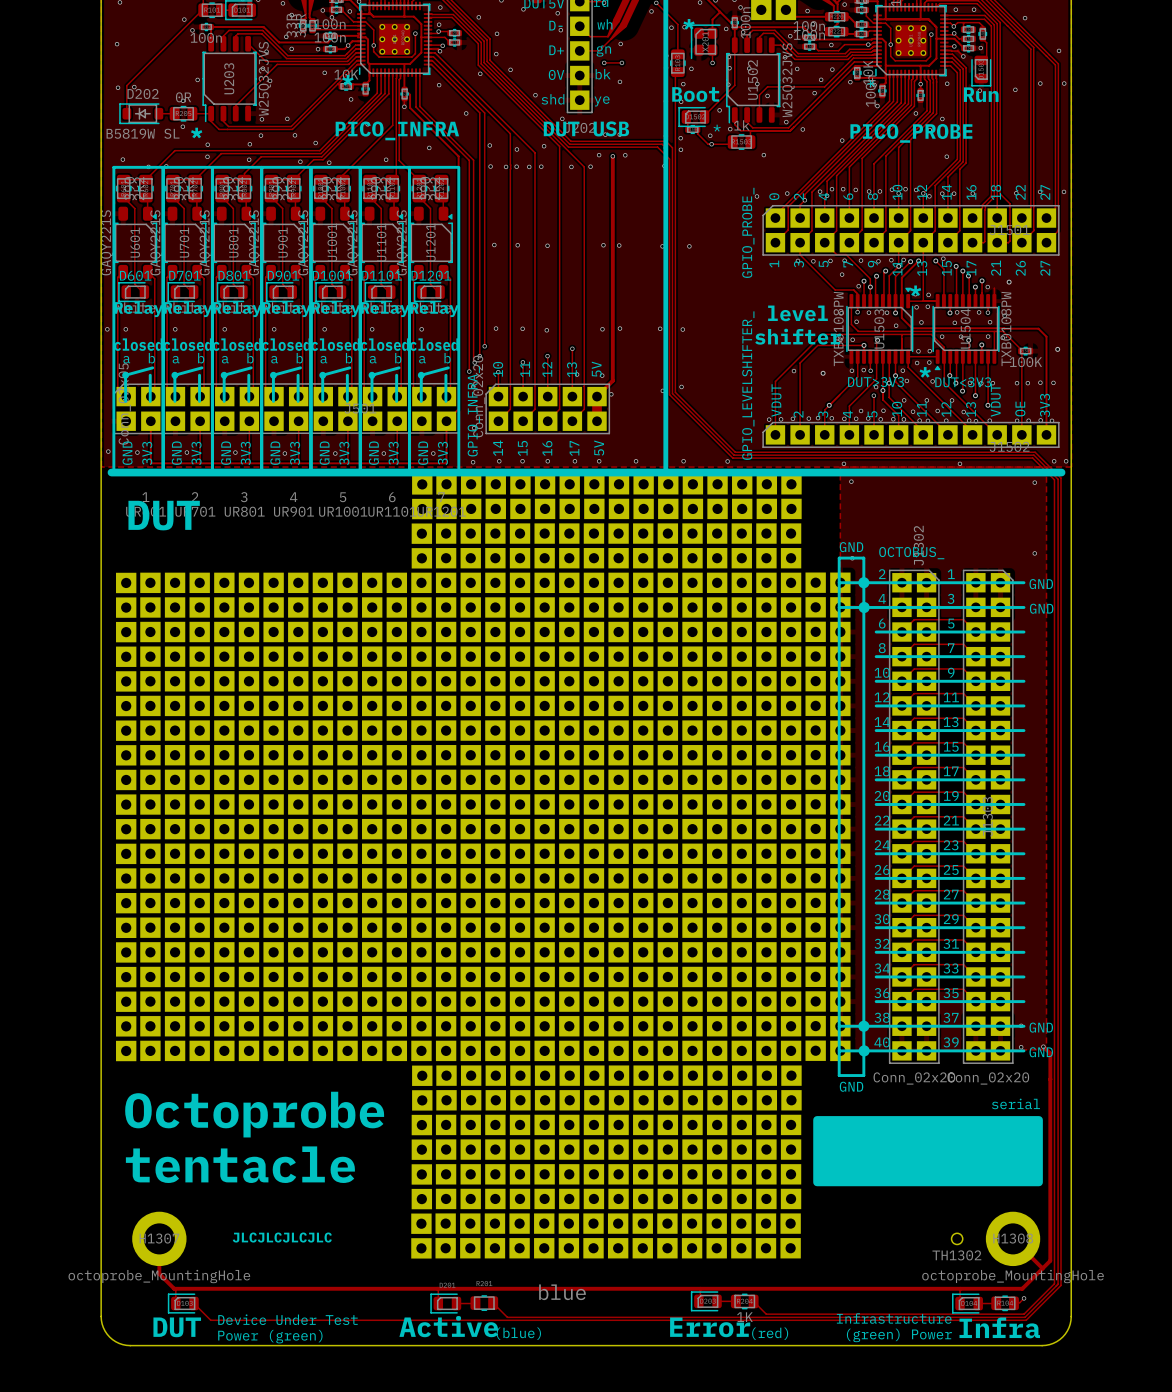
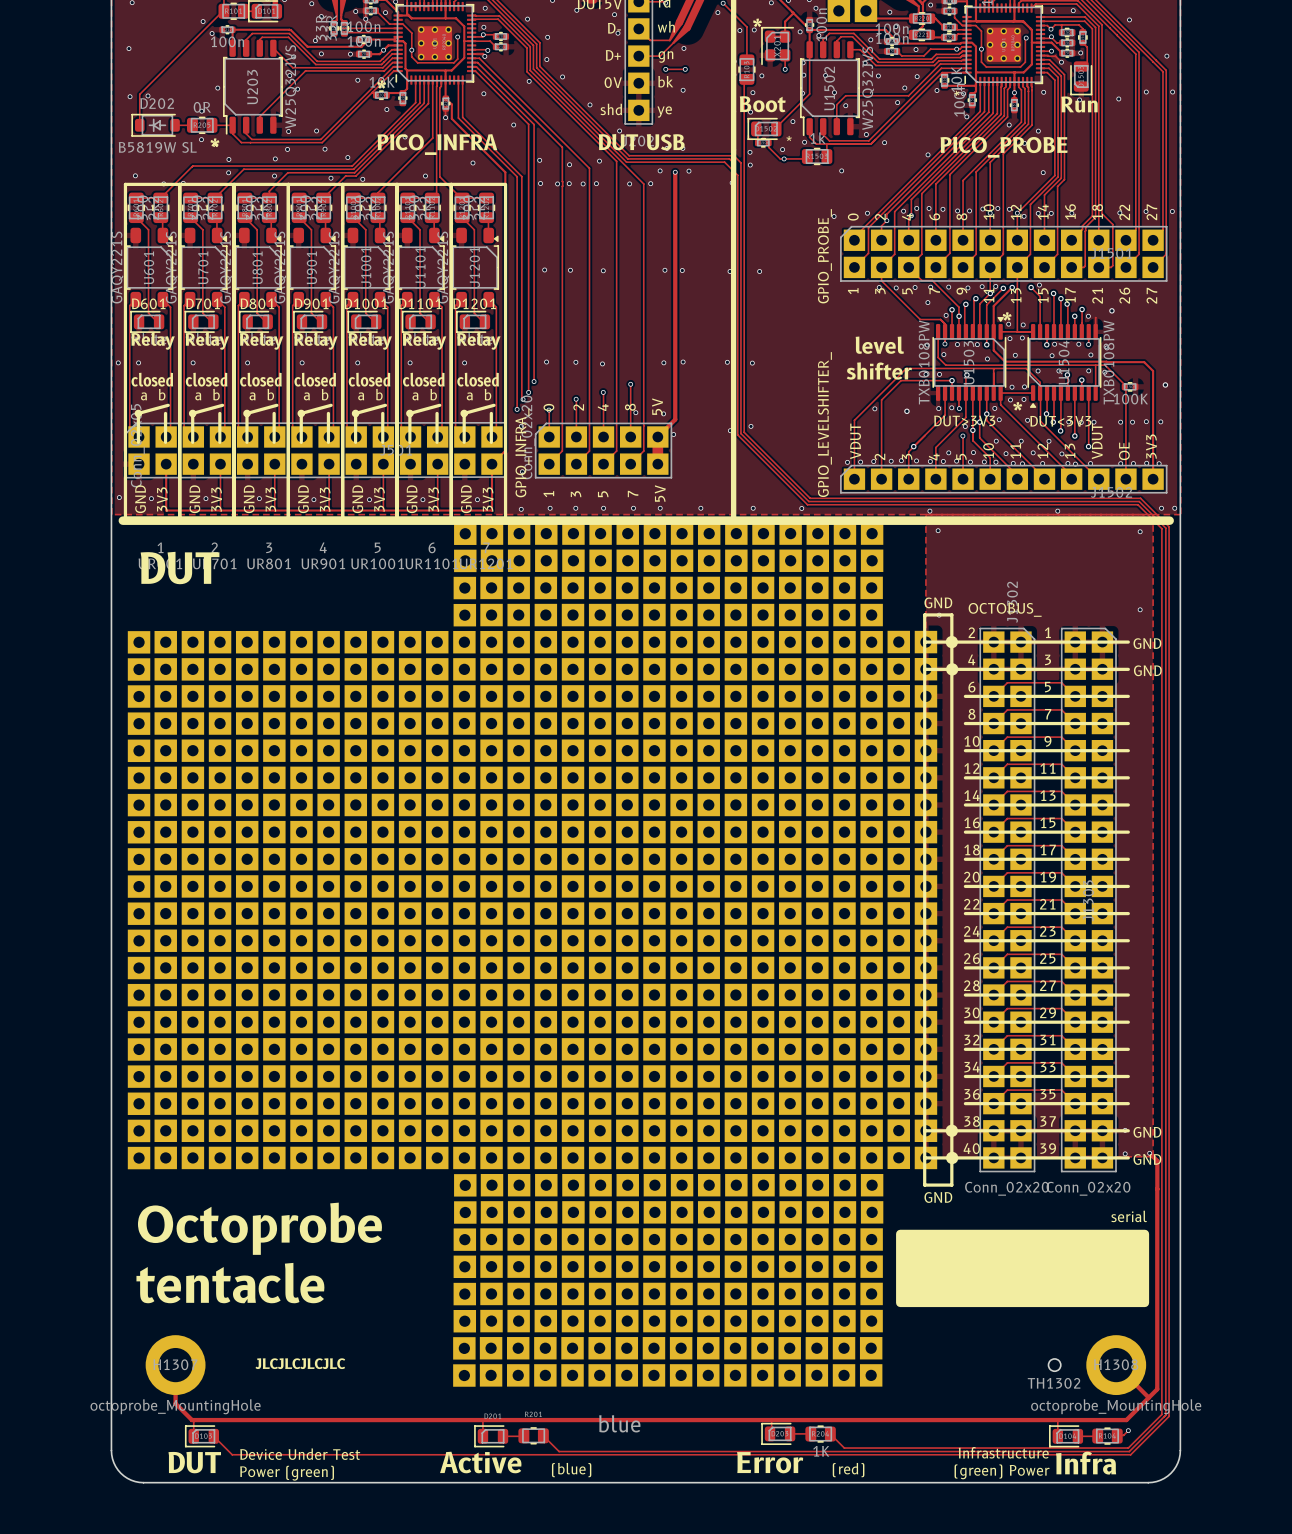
part text: 10 (498, 369) -> 0 (548, 407)
part text: 11 (525, 369) -> 2 (578, 407)
part text: 12 (547, 369) -> 4 (603, 407)
part text: 13 (572, 369) -> 8 (630, 407)
part text: 14 (498, 448) -> 1 (548, 494)
part text: 15 (522, 448) -> 3 (576, 494)
part text: 16 (547, 448) -> 5 (603, 494)
part text: 17 (574, 448) -> 7 (633, 494)

